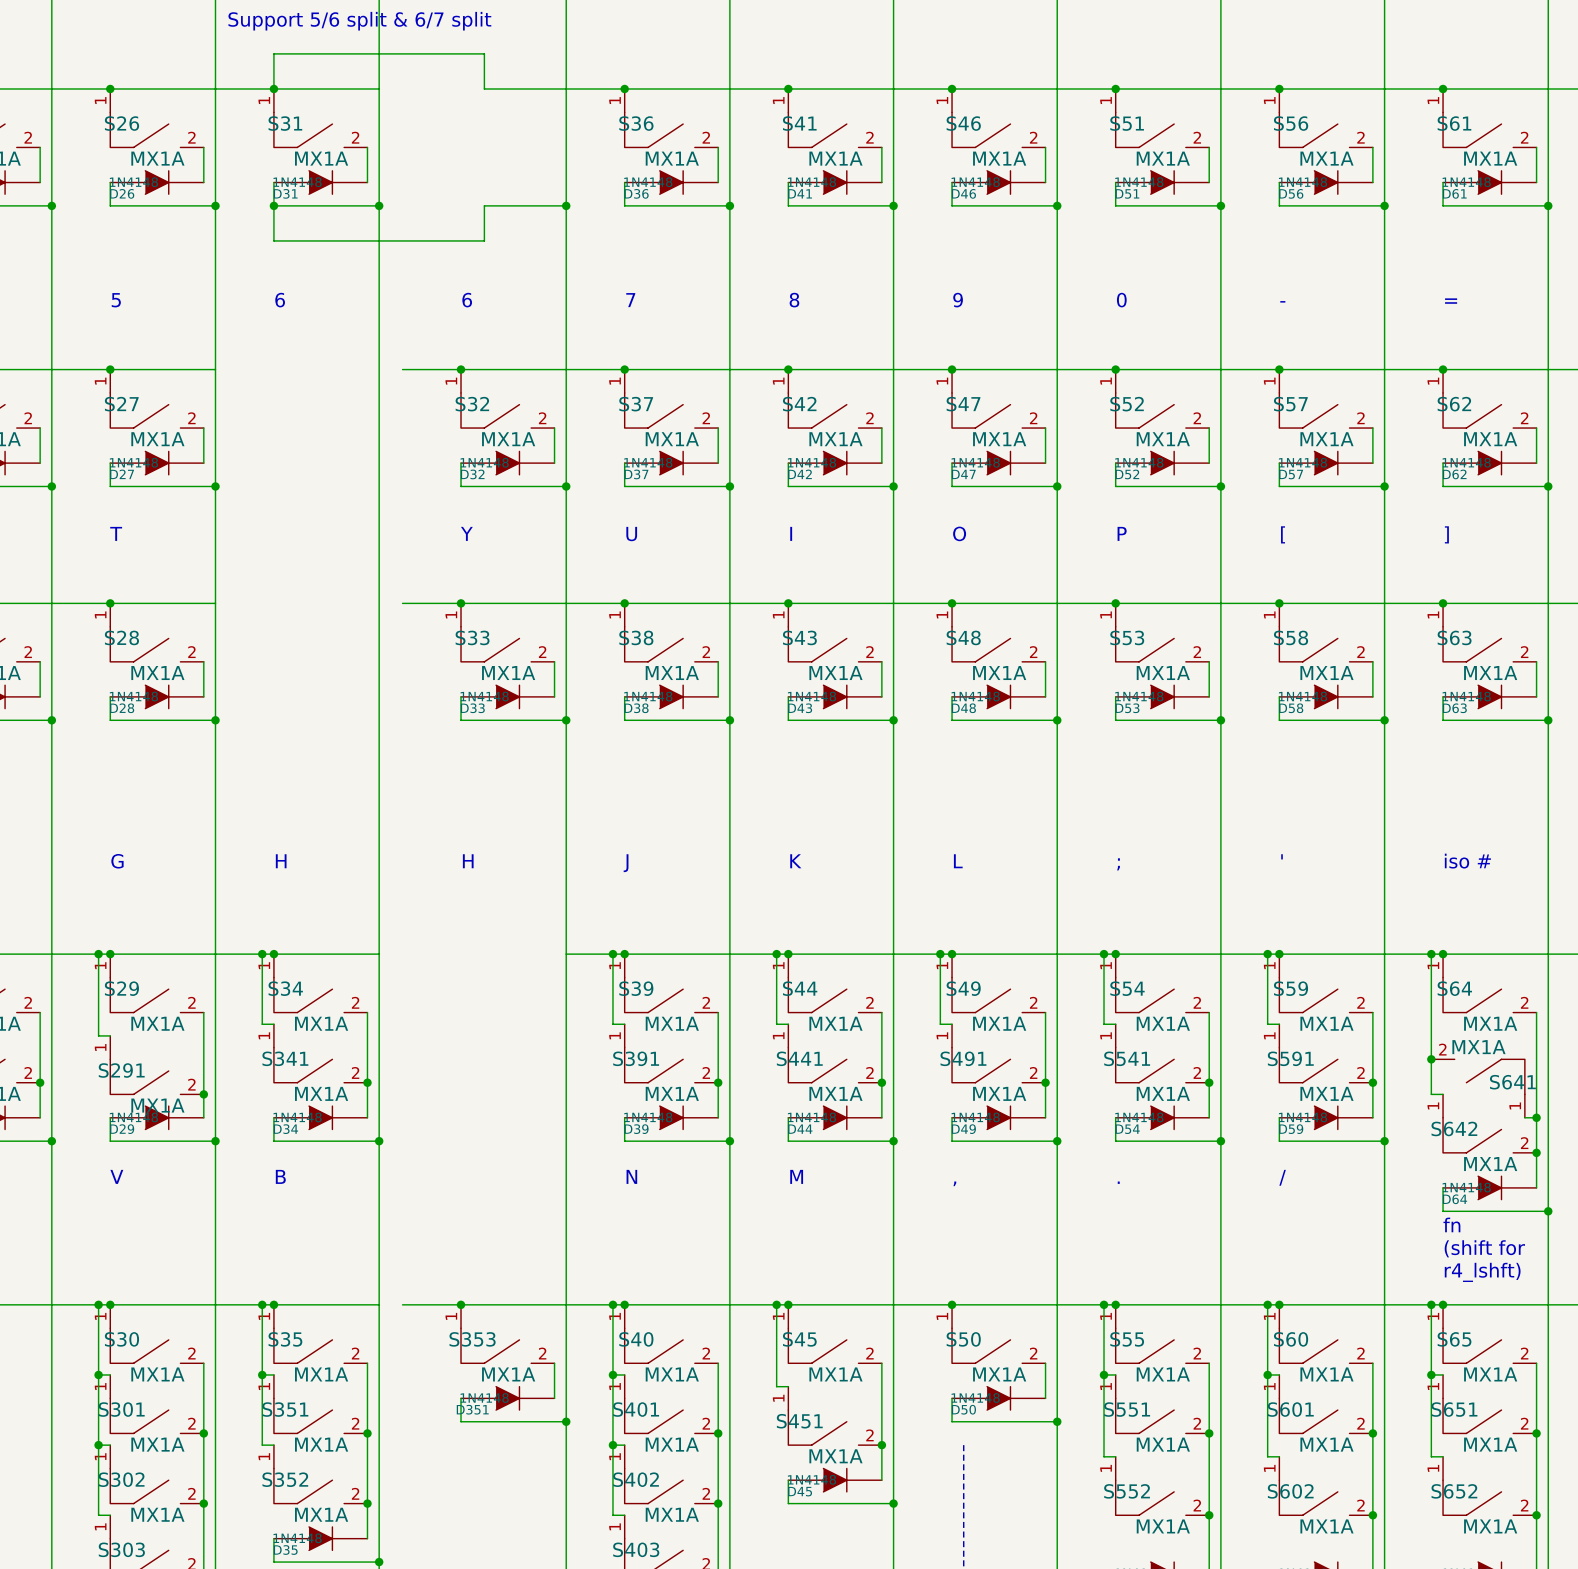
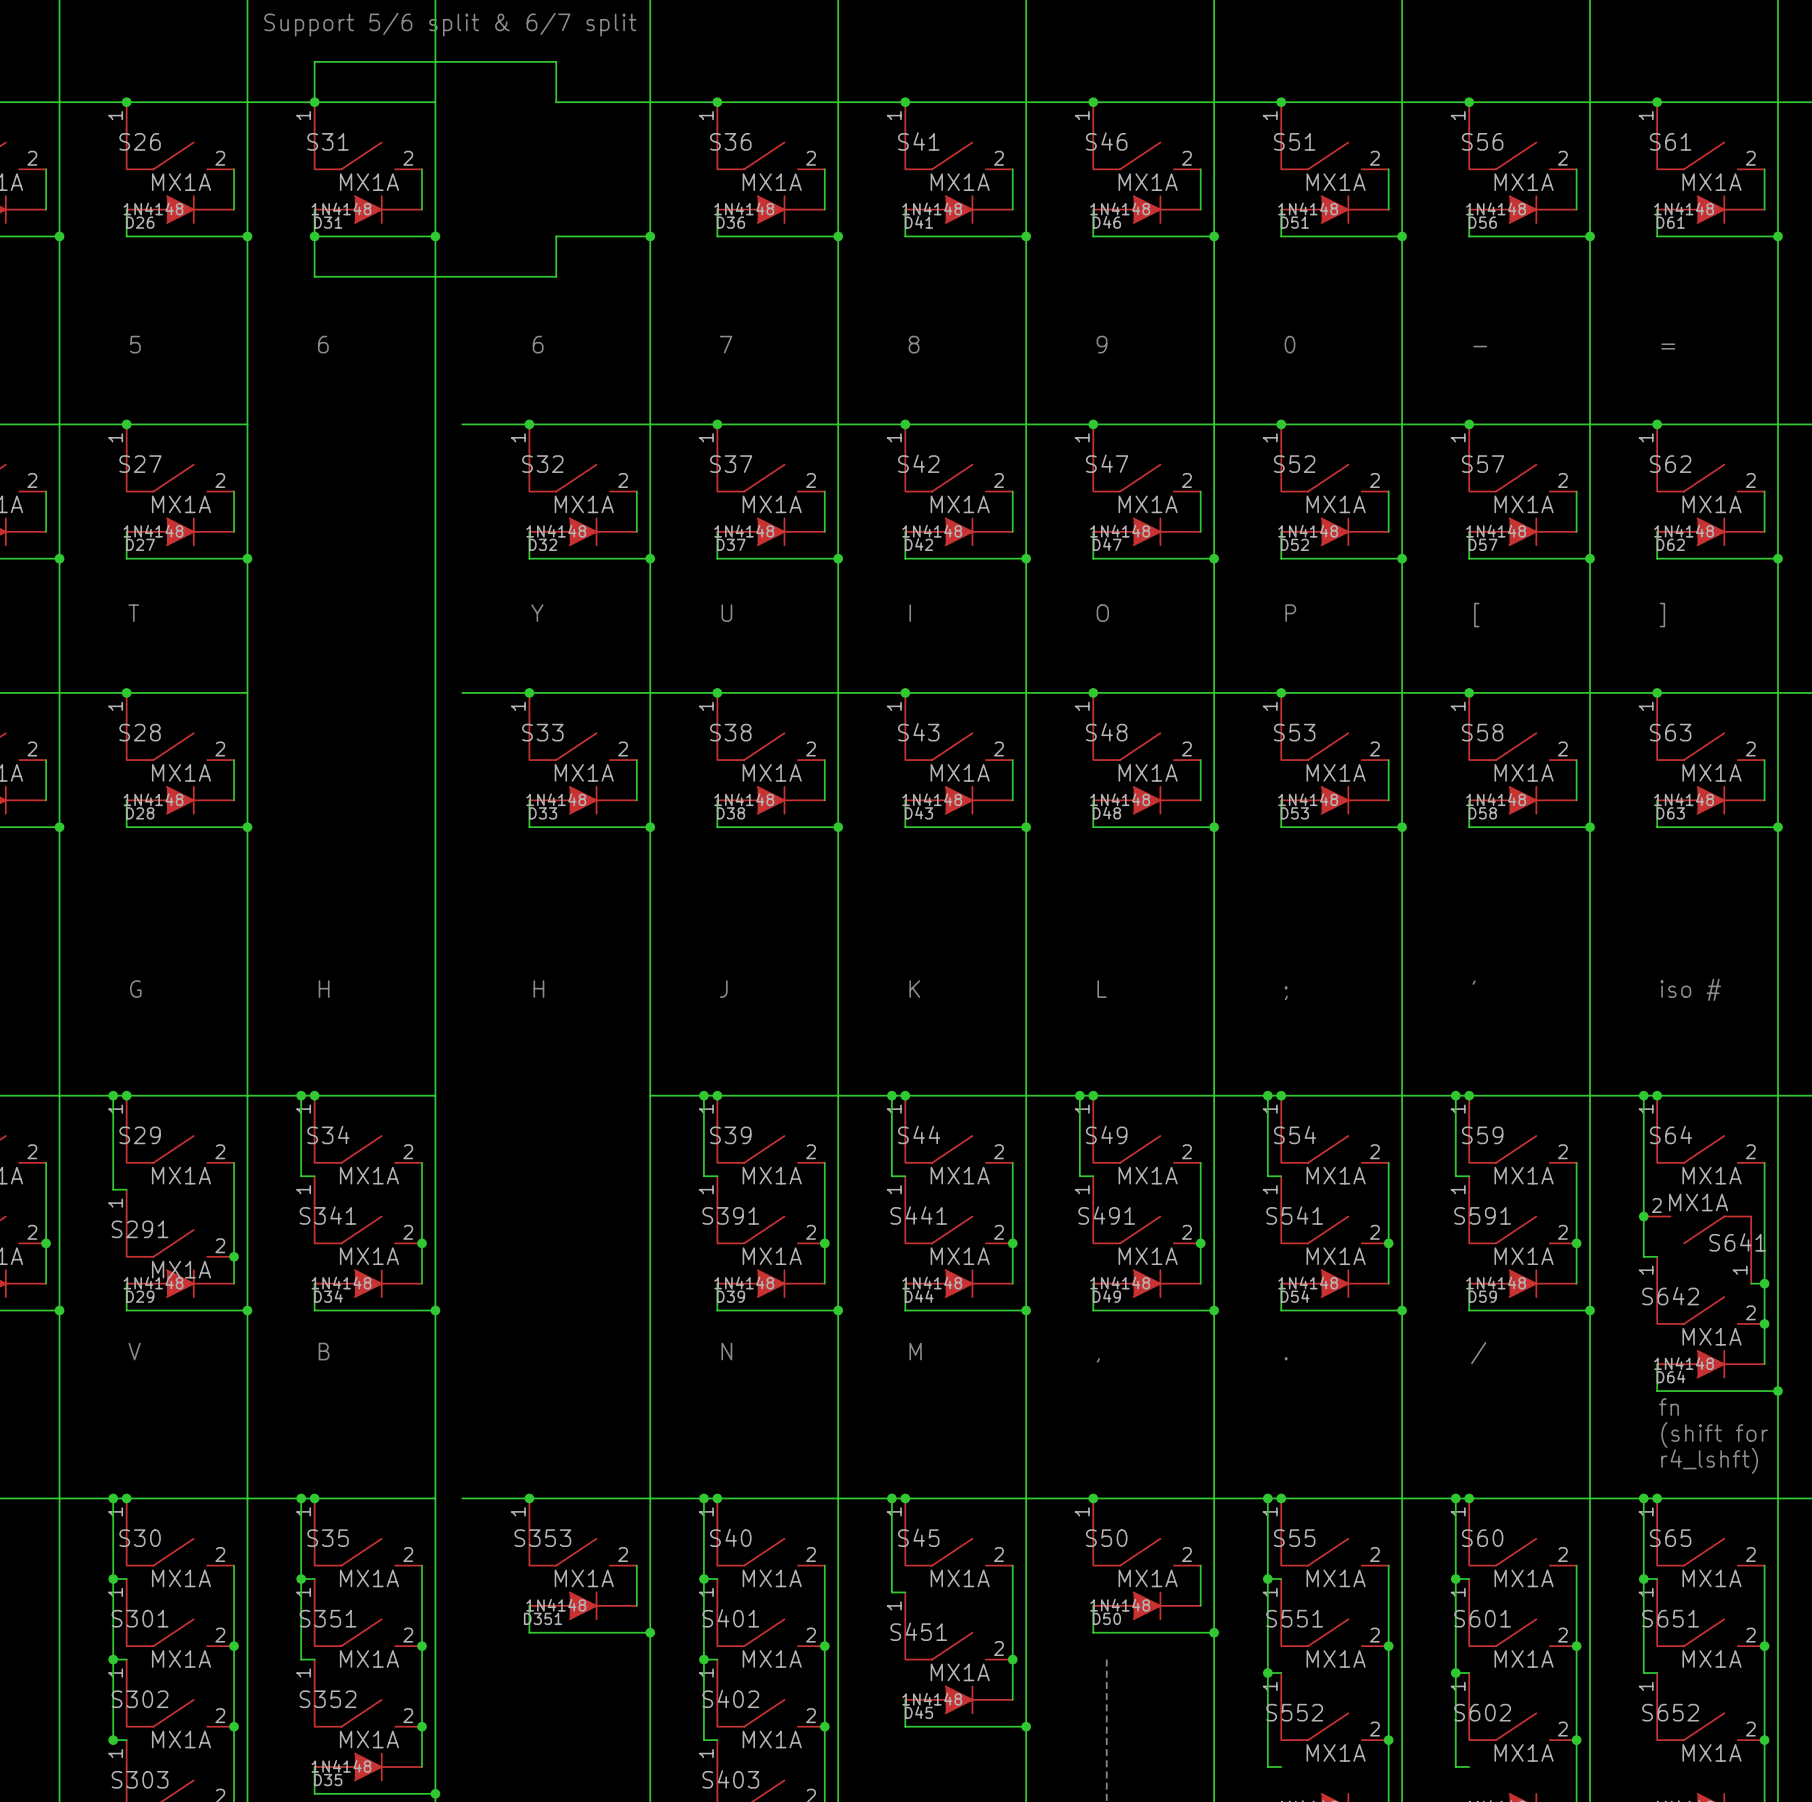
wire: none -> (1267, 1673) (1267, 1766) (1281, 1766)
junction: none -> (1267, 1673)
wire: none -> (1455, 1673) (1455, 1766) (1469, 1766)
junction: none -> (1455, 1673)
junction: none -> (113, 1740)

